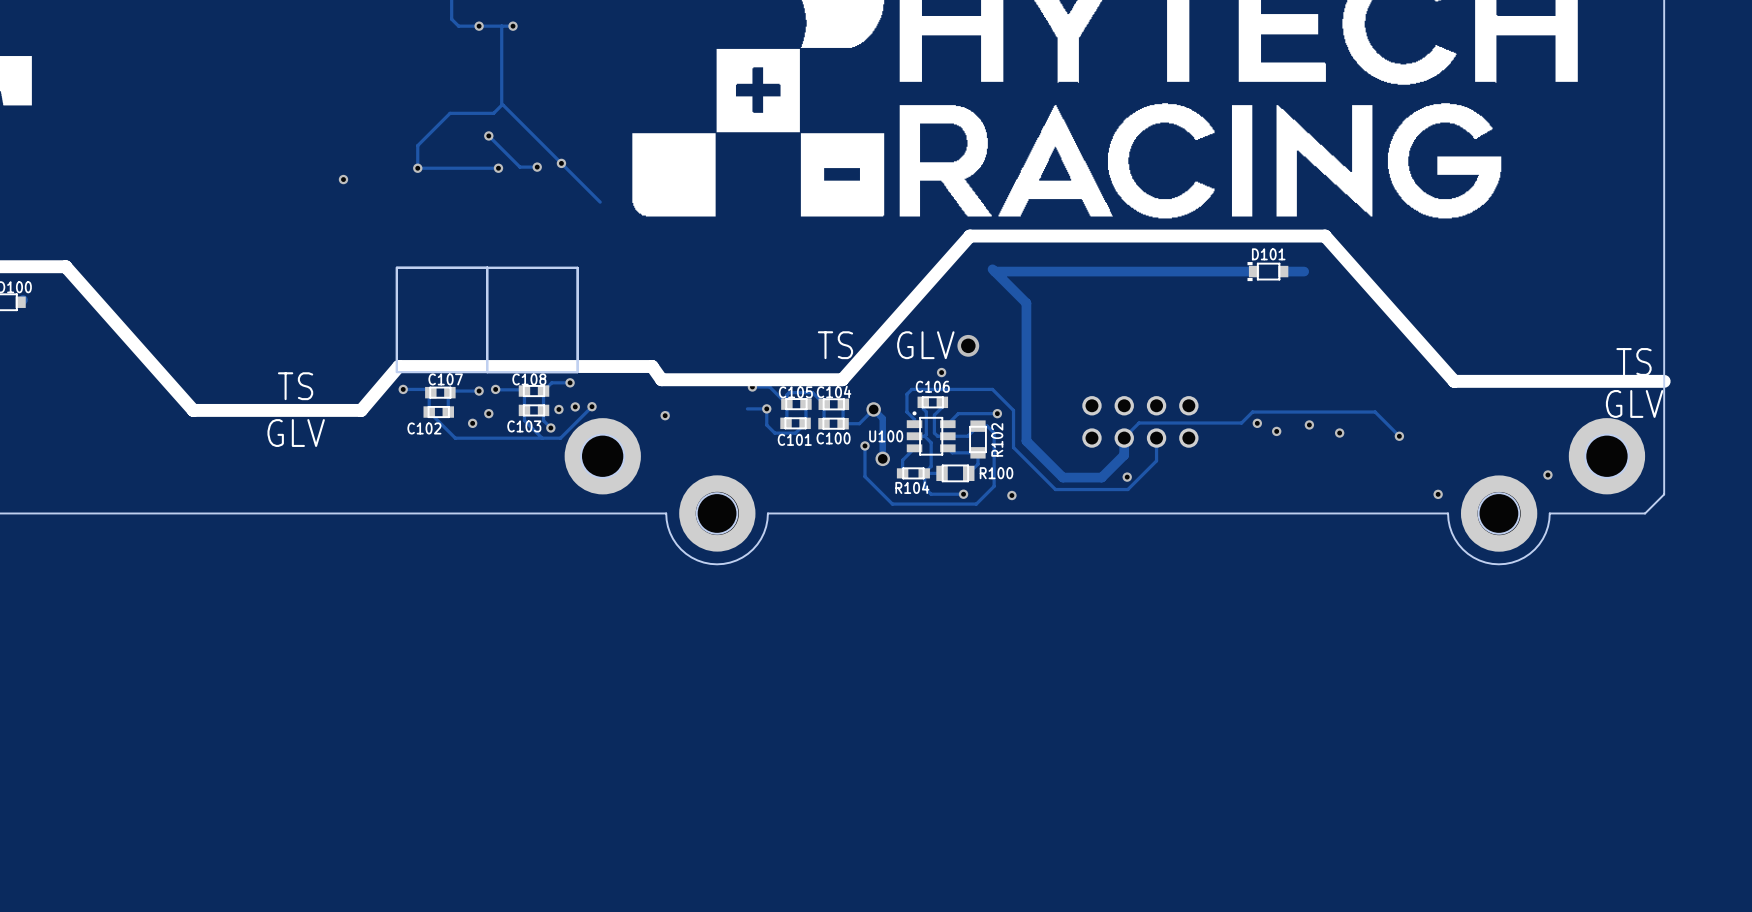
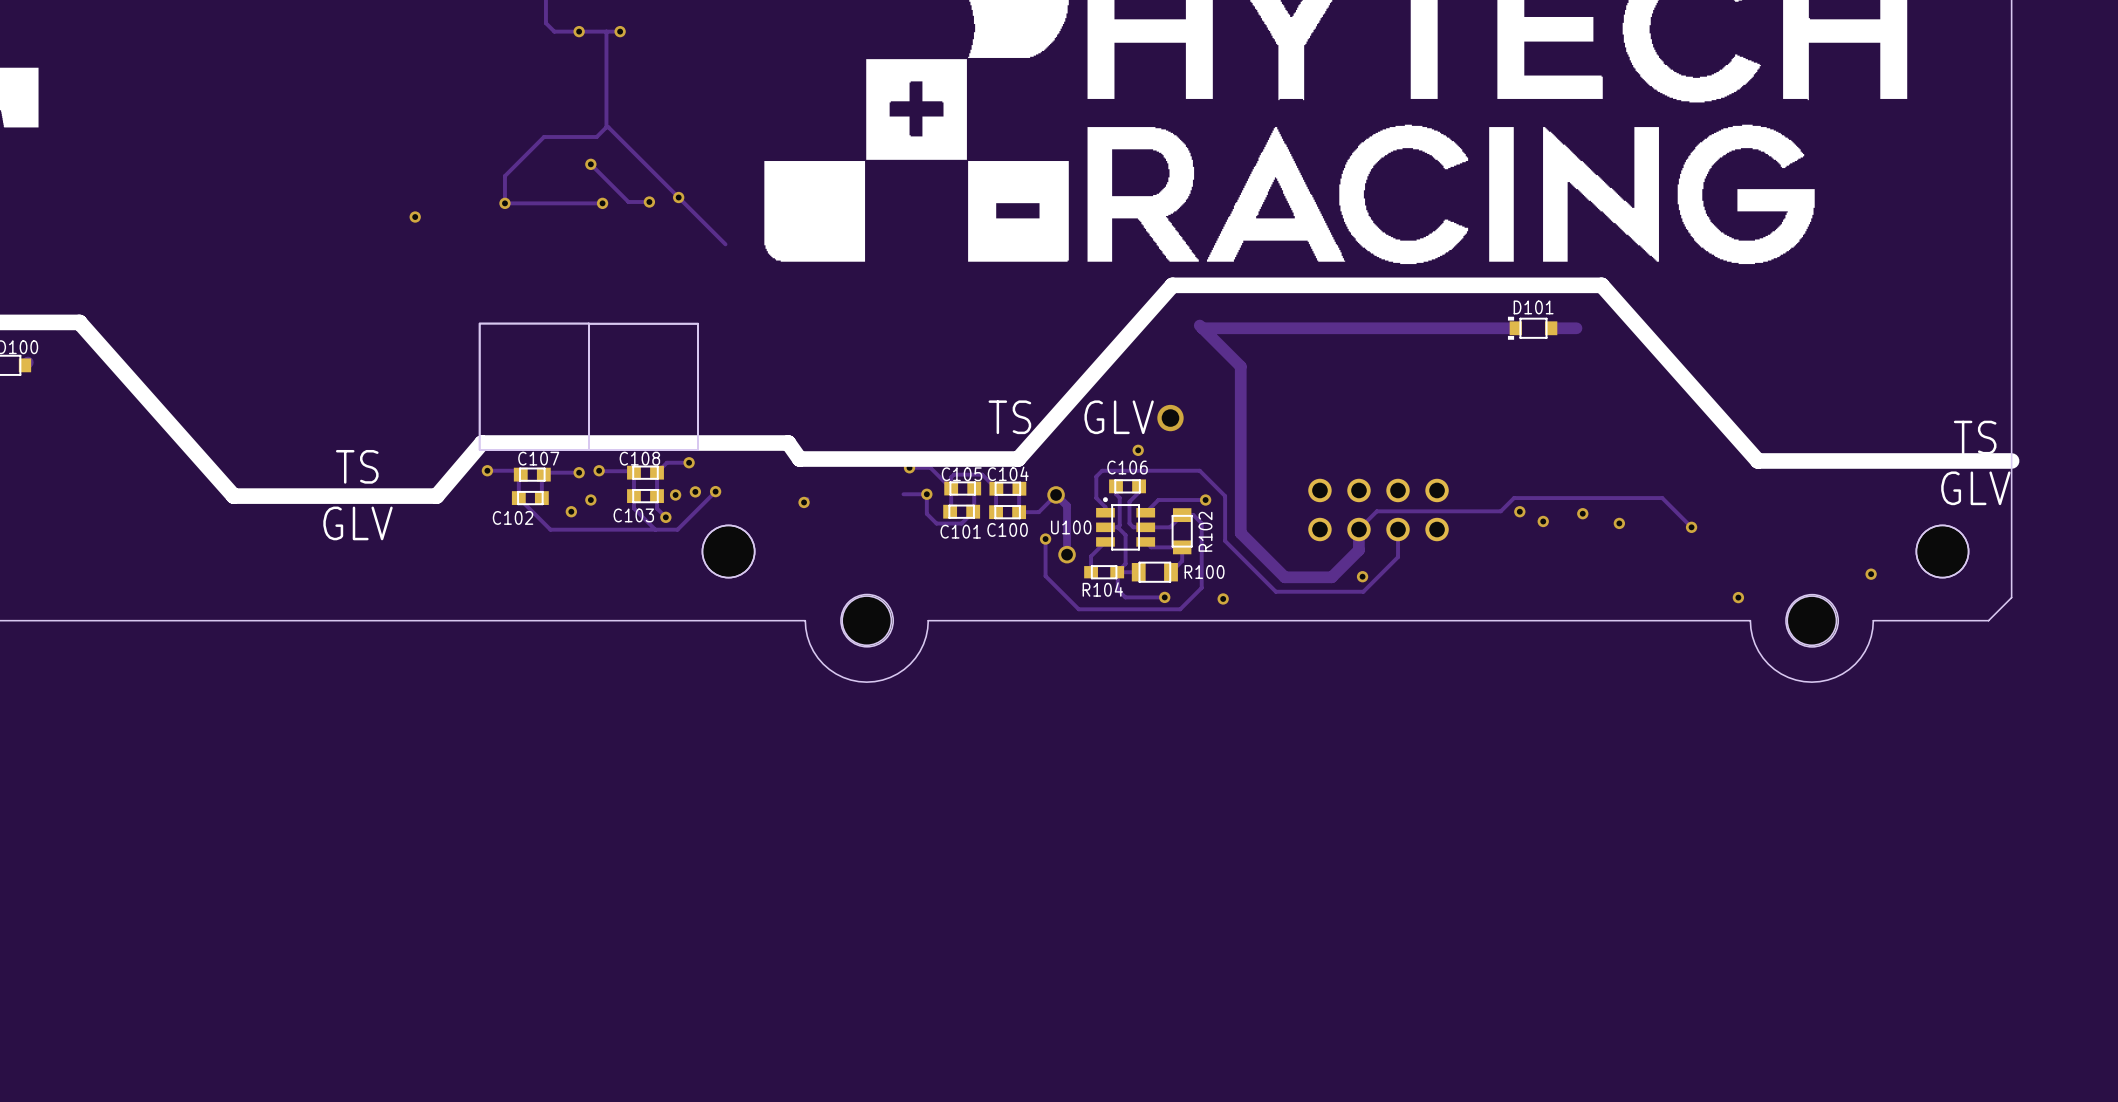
part footprint: [564, 418, 641, 495] -> [702, 525, 755, 578]
part footprint: [1568, 418, 1646, 495] -> [1916, 525, 1969, 578]
part footprint: [679, 475, 756, 552] -> [840, 594, 894, 647]
part footprint: [1460, 475, 1538, 552] -> [1785, 594, 1839, 647]

